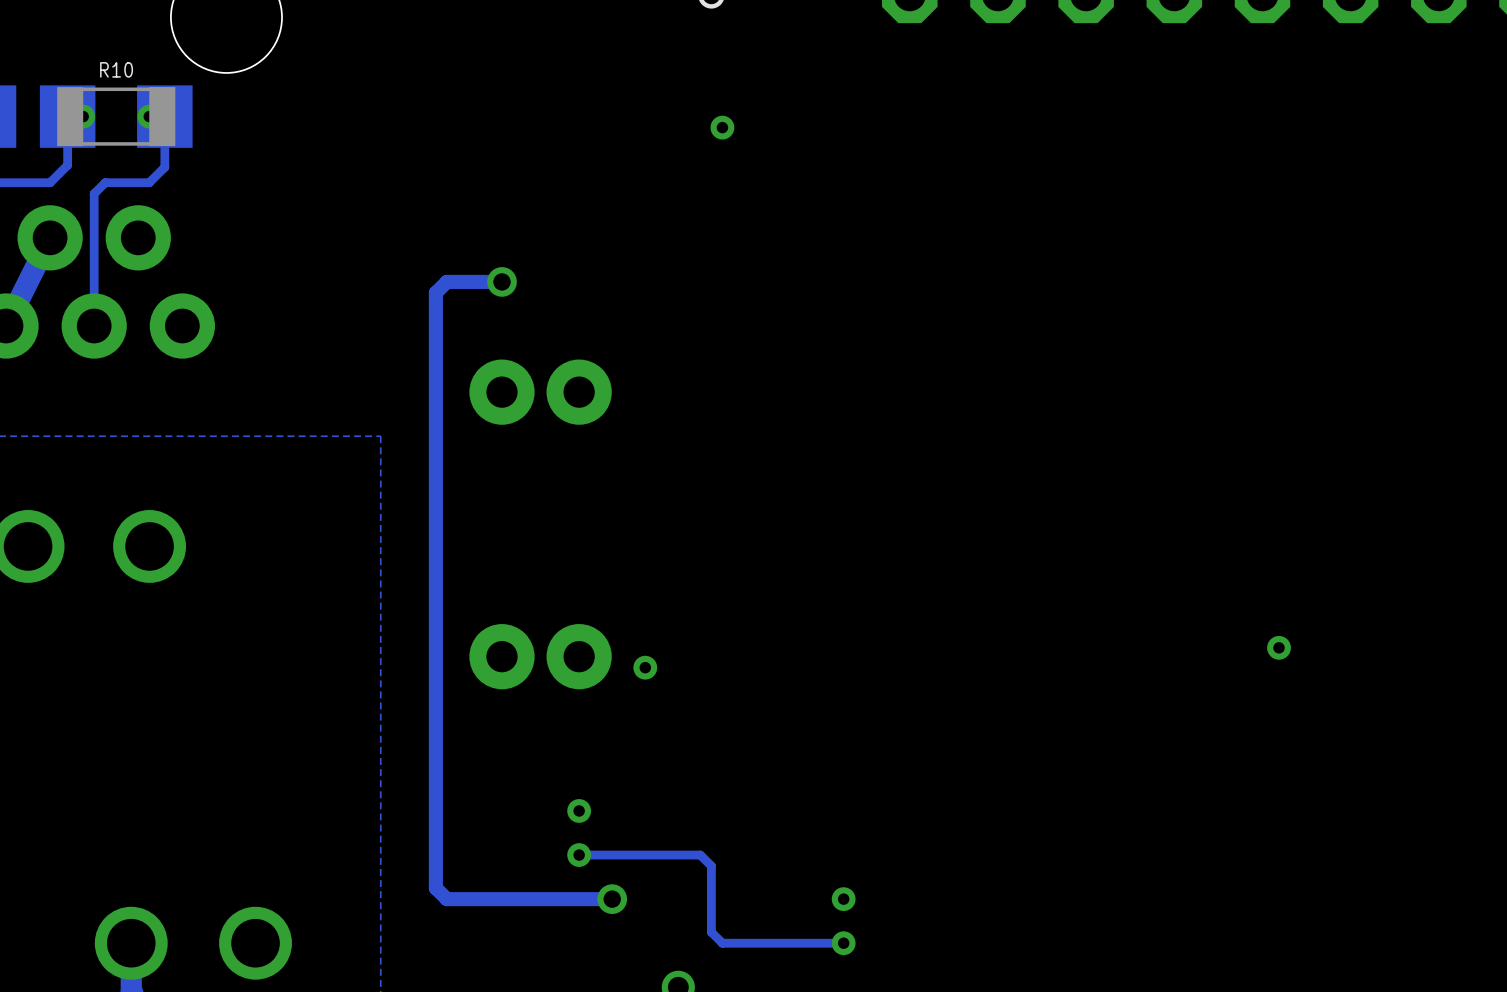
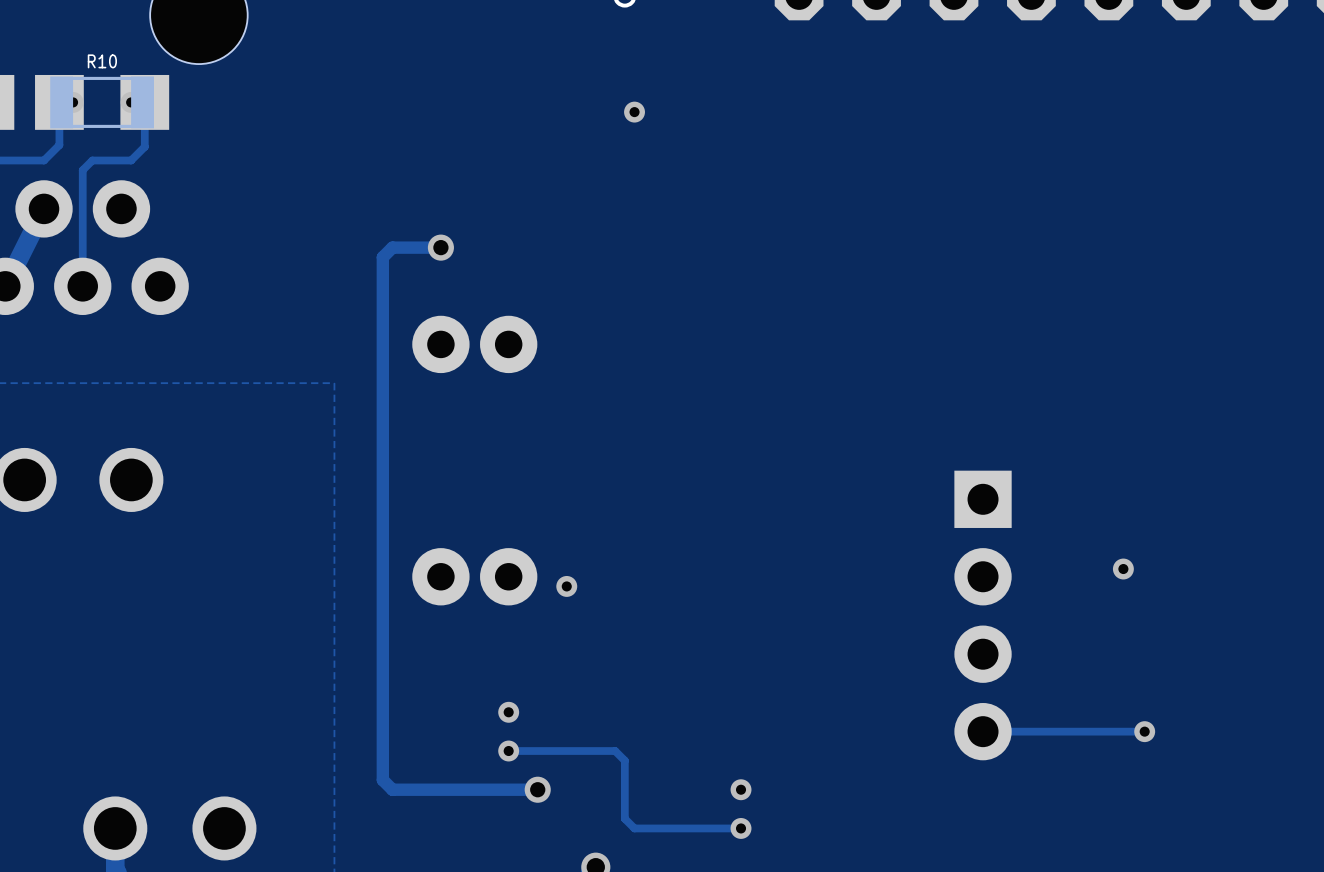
part: none -> (983, 615)
track: none -> (1144, 731) (983, 731)
via: none -> (1144, 731)

